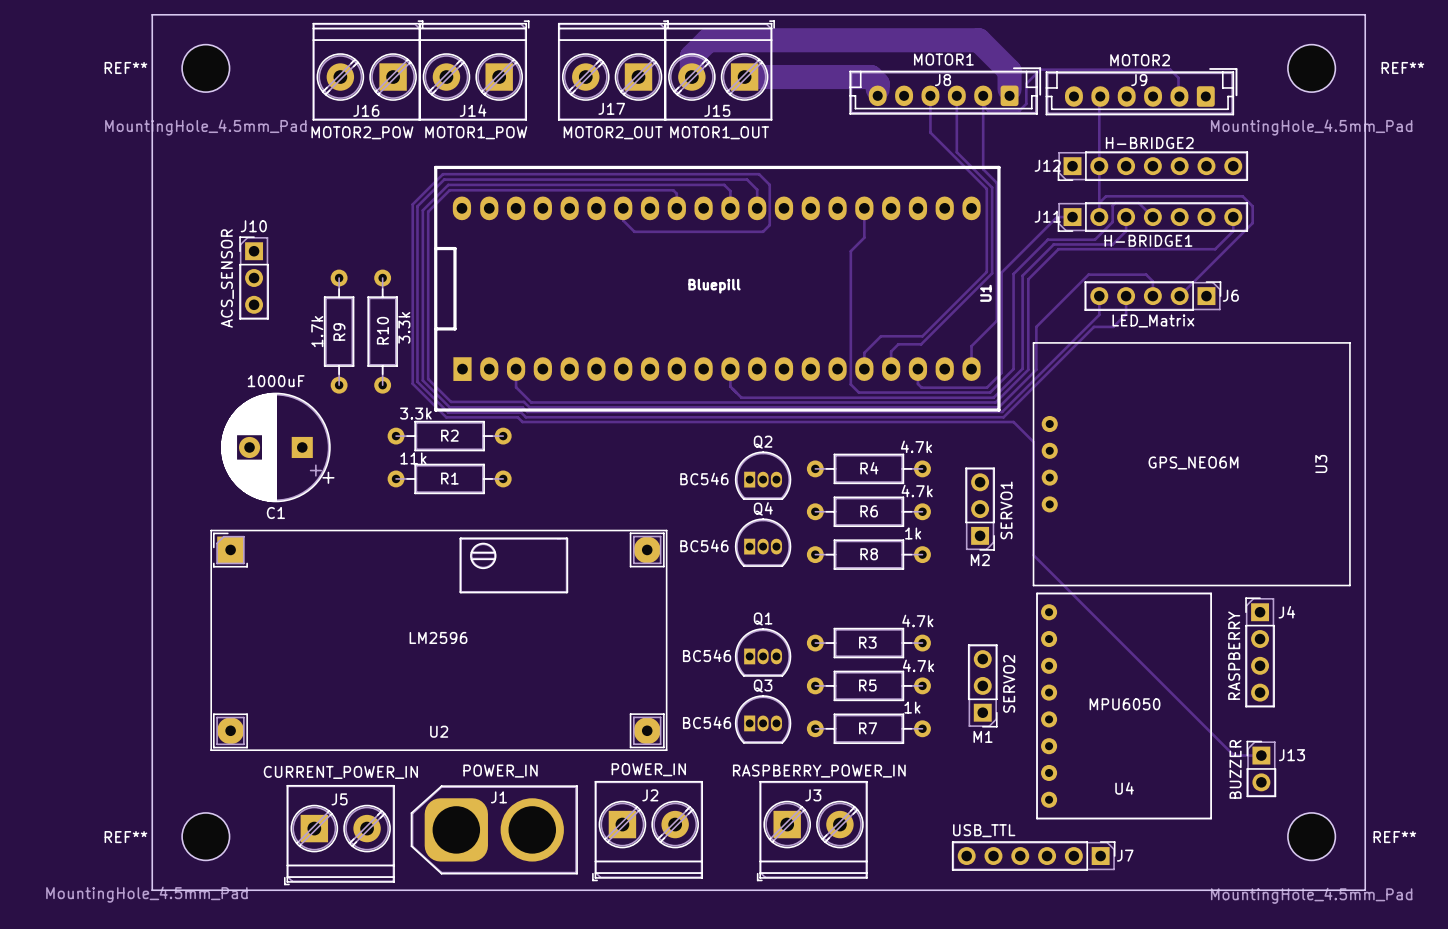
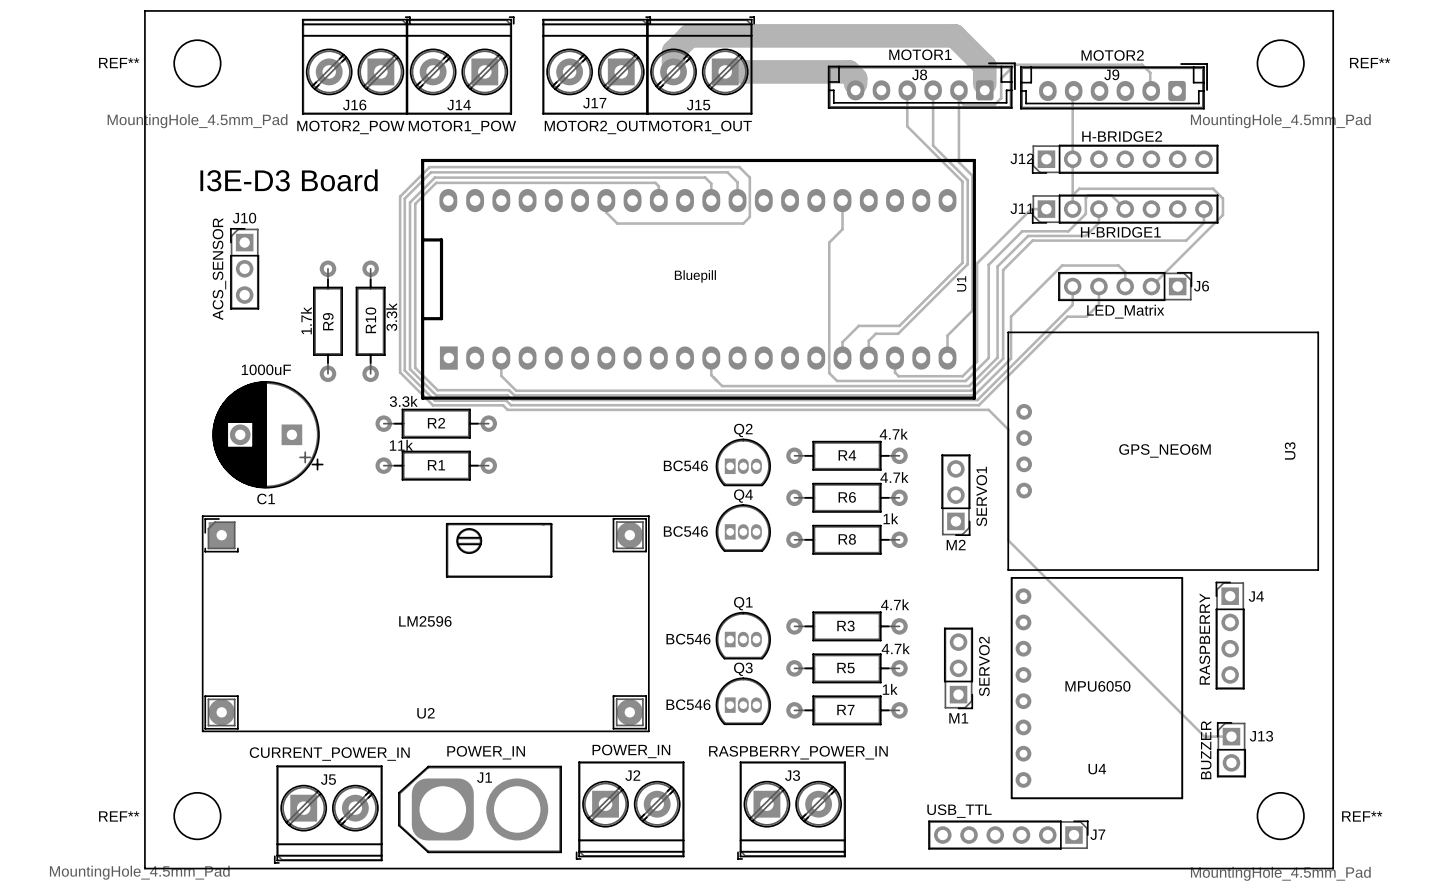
text: none -> I3E-D3 Board (289, 180)

